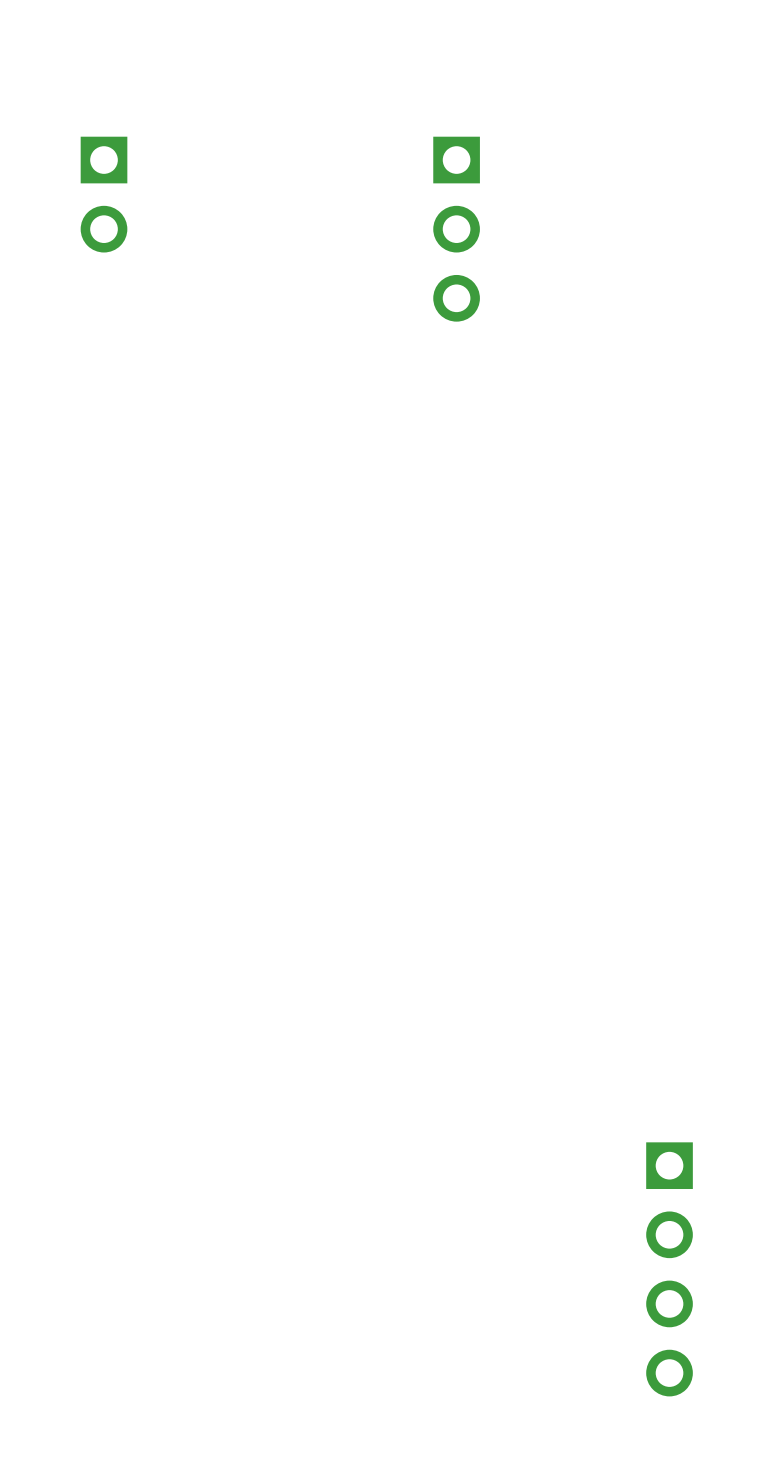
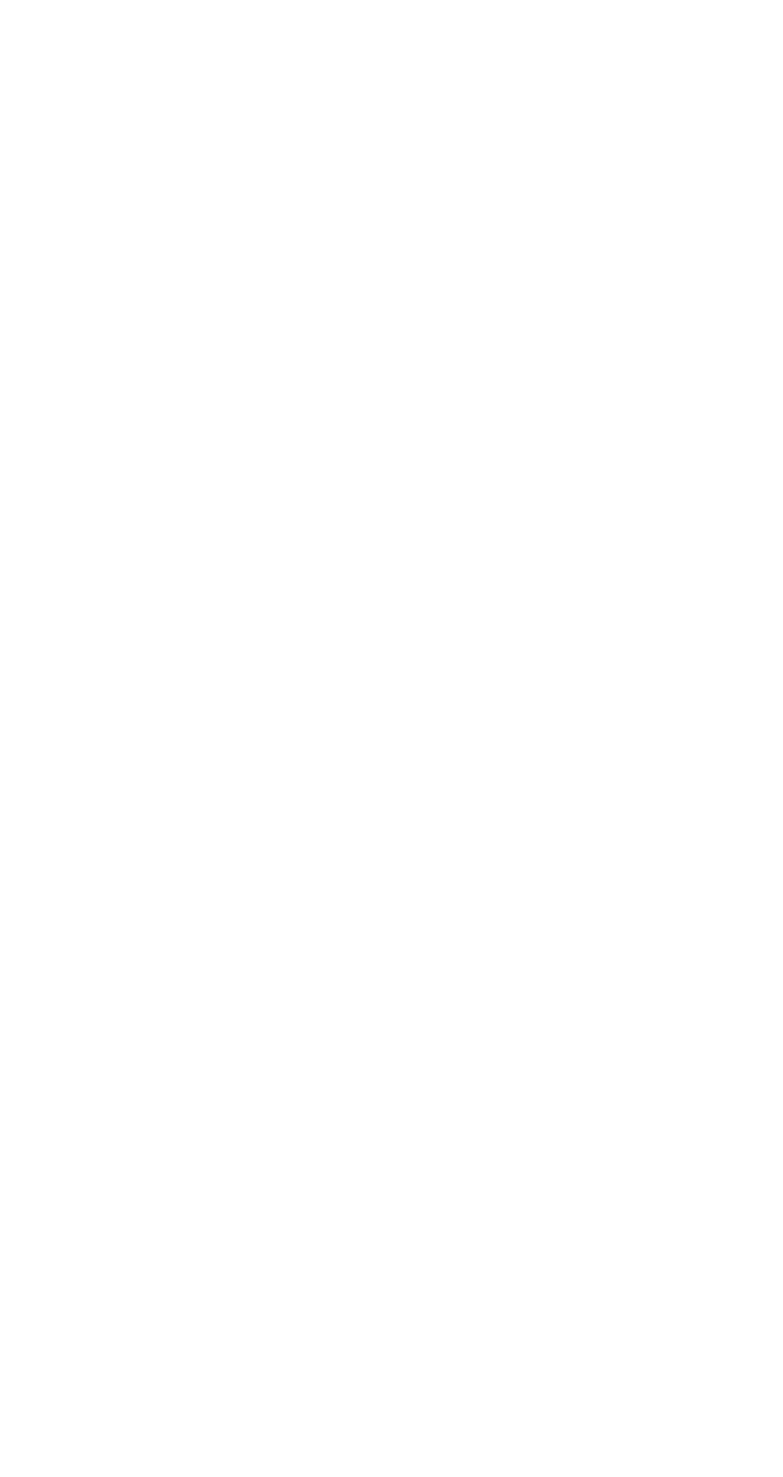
part: (104, 194) -> none
part: (456, 229) -> none
part: (669, 1269) -> none

